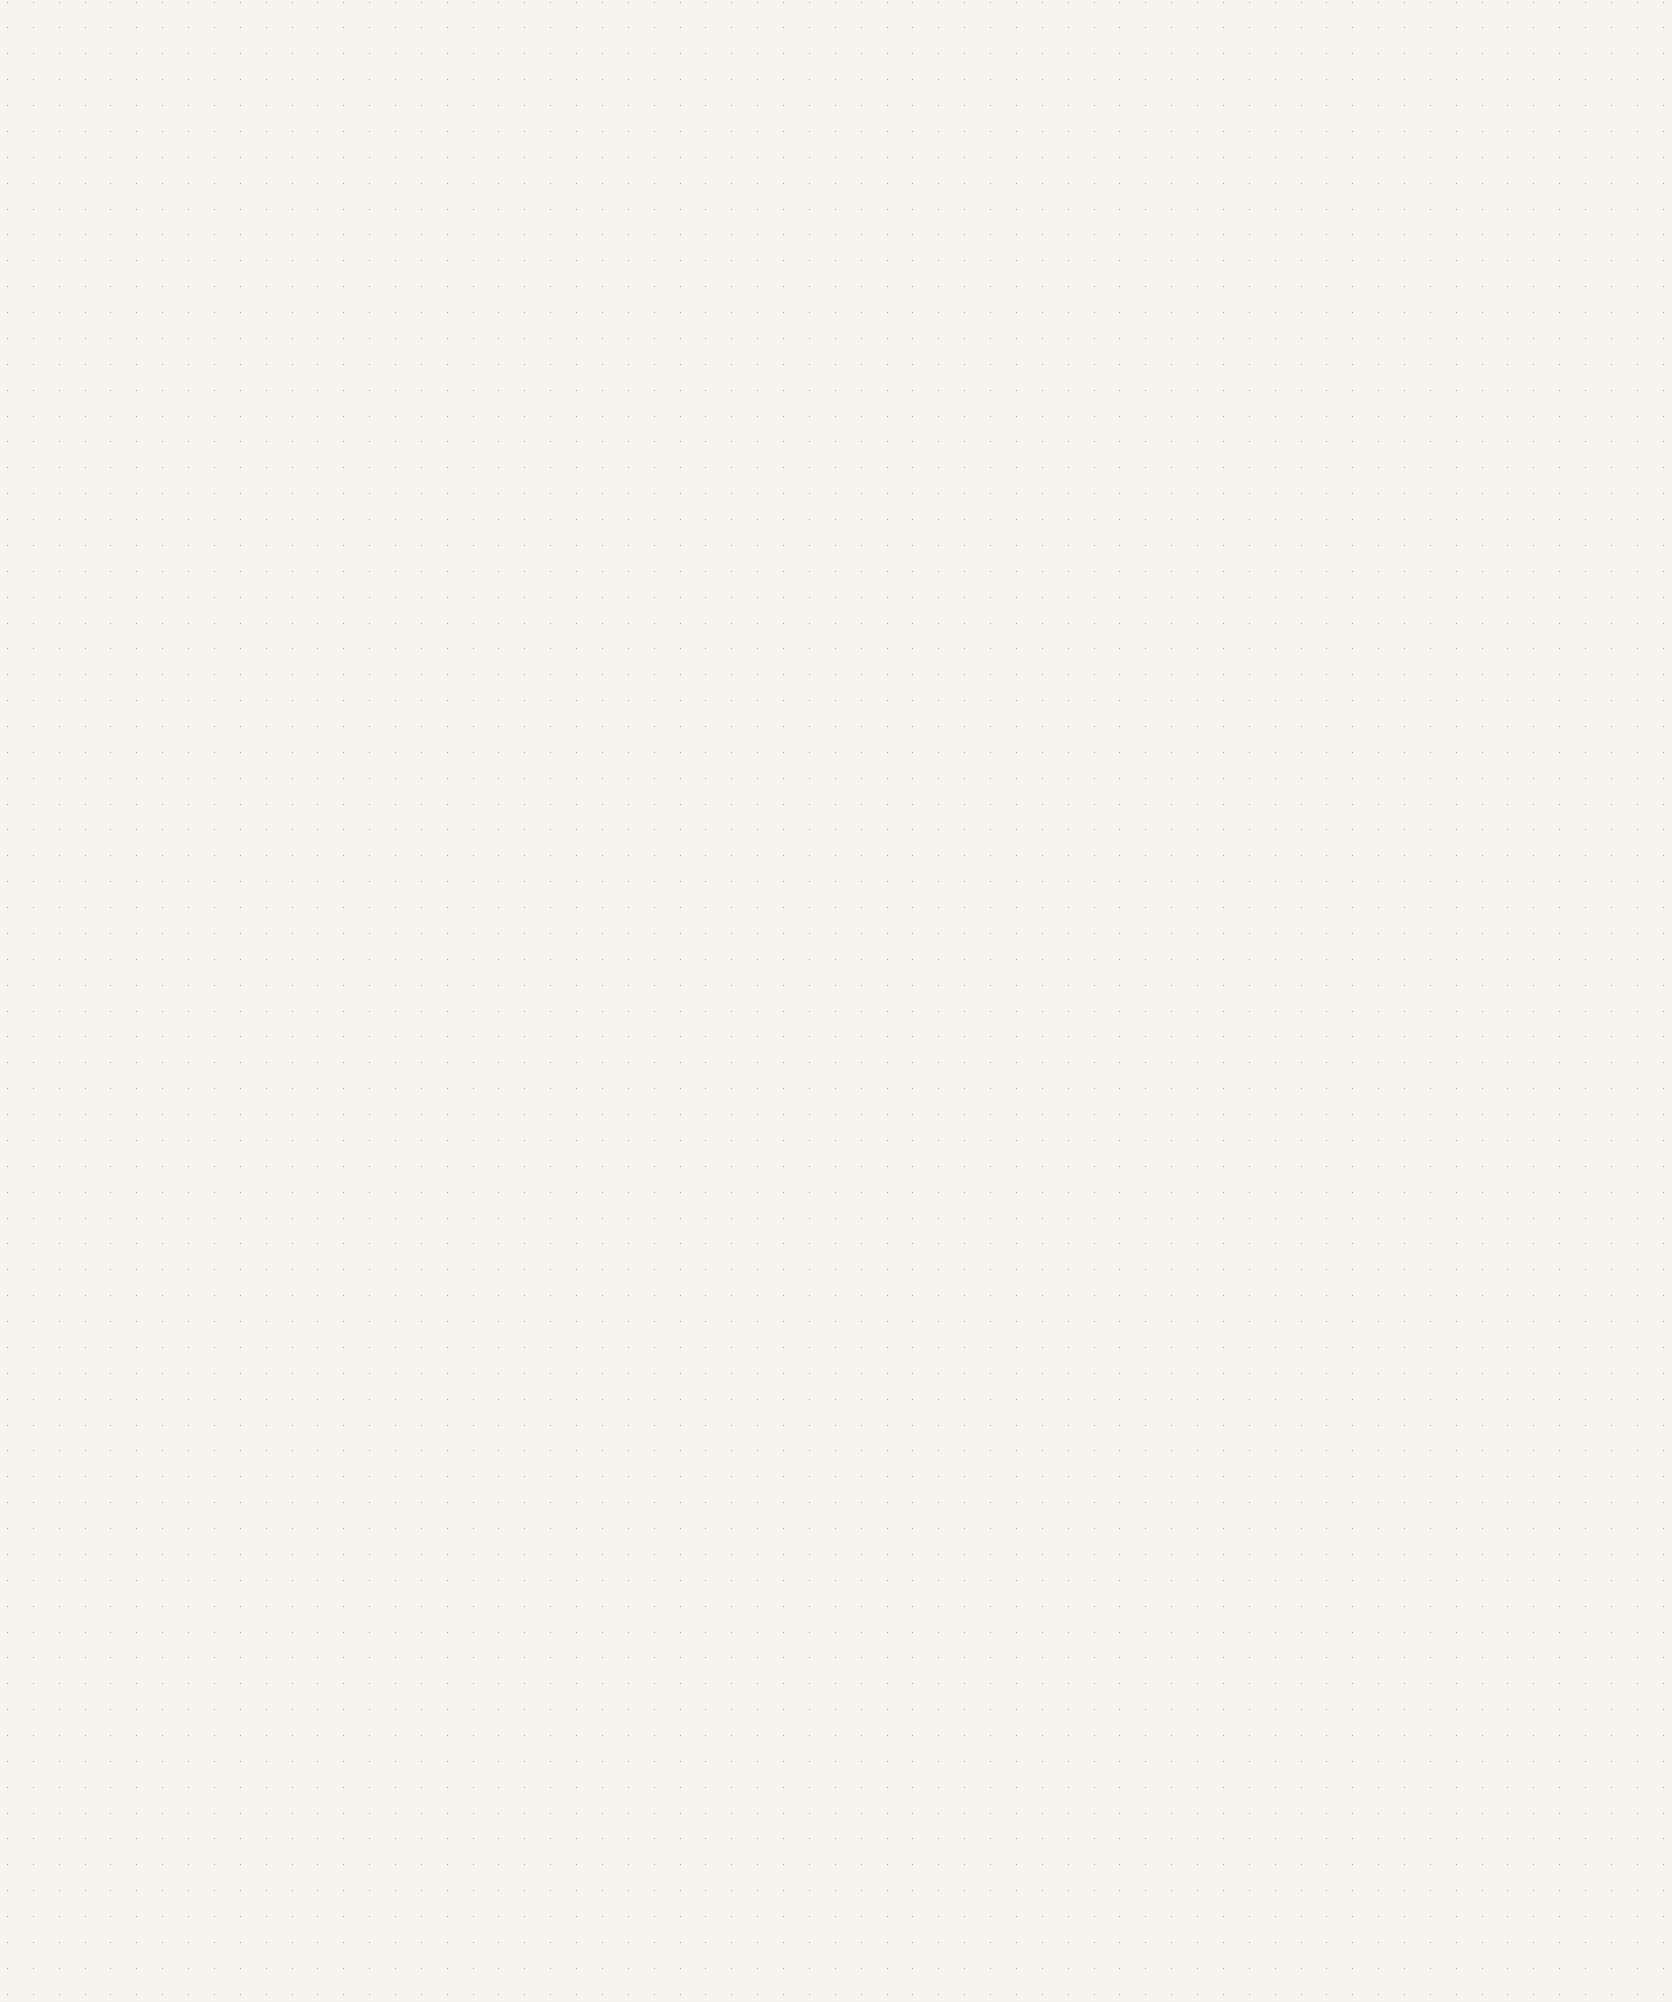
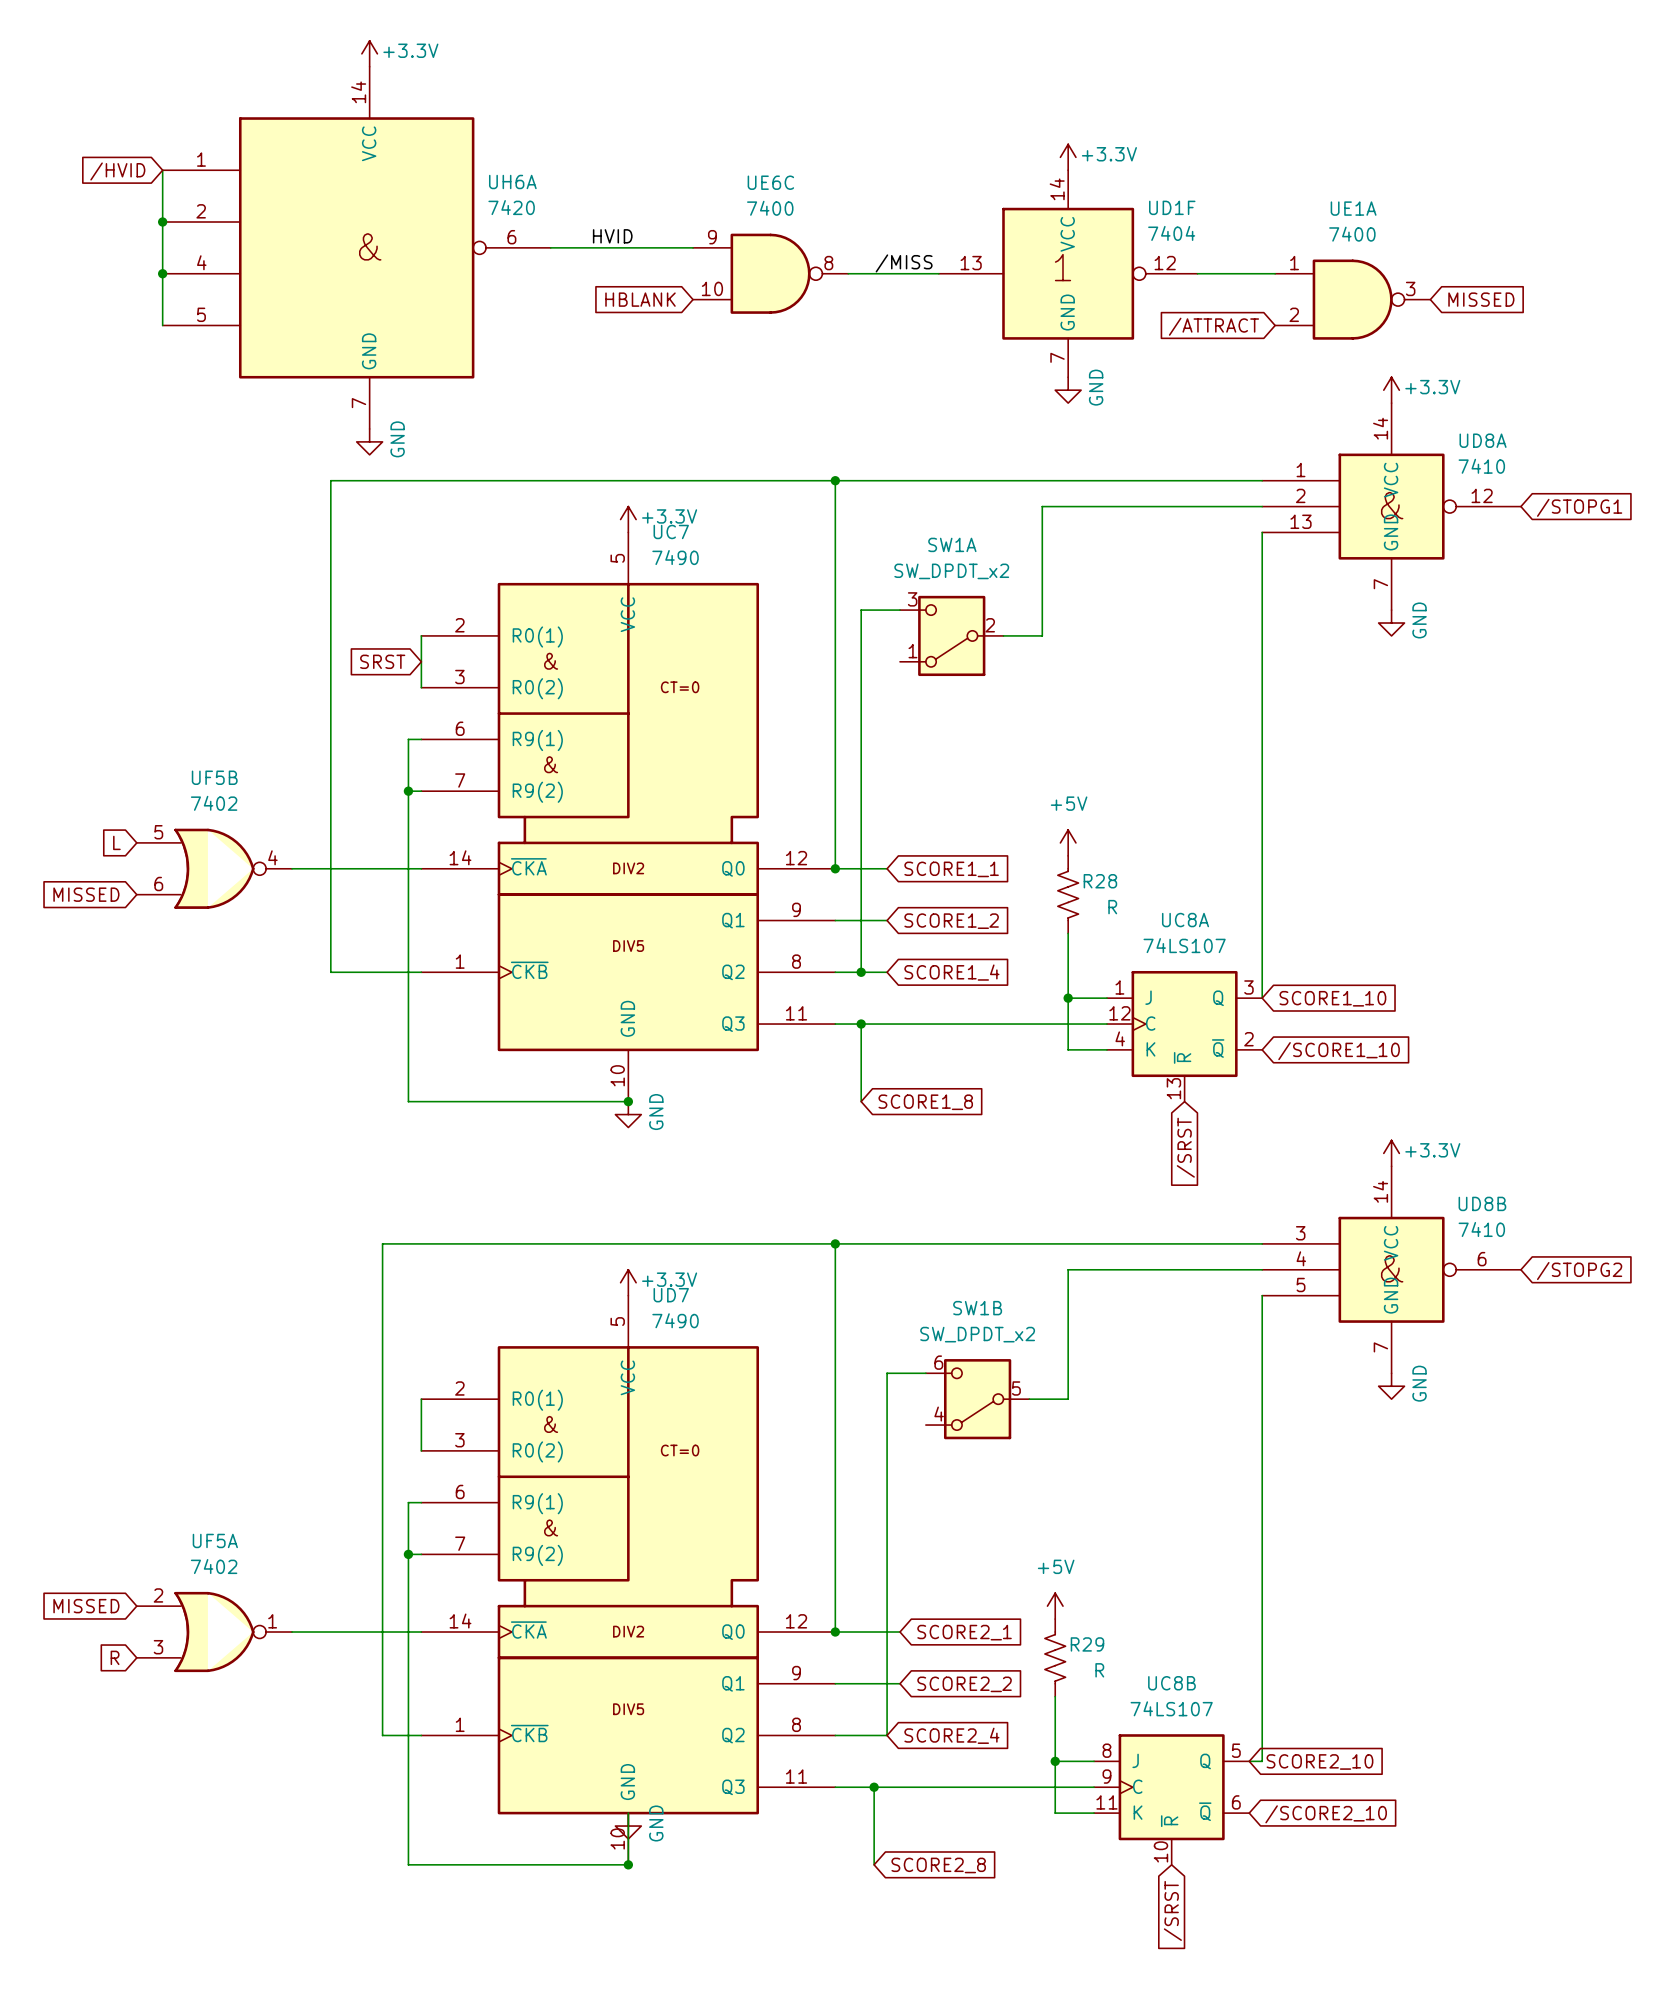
power symbol: none -> +3.3V (369, 53)
power symbol: none -> +3.3V (1068, 157)
global label: none -> /HVID (117, 171)
wire: none -> (162, 170) (162, 325)
junction: none -> (162, 222)
label: none -> HVID (612, 236)
UH6A: none -> 7420 (356, 247)
wire: none -> (550, 247) (693, 247)
label: none -> /MISS (904, 263)
junction: none -> (162, 273)
UE6C: none -> 7400 (770, 273)
wire: none -> (848, 273) (938, 273)
UD1F: none -> 7404 (1068, 273)
wire: none -> (1197, 273) (1275, 273)
global label: none -> HBLANK (640, 299)
UE1A: none -> 7400 (1352, 299)
global label: none -> MISSED (1481, 299)
global label: none -> /ATTRACT (1213, 326)
power symbol: none -> GND (1068, 390)
power symbol: none -> +3.3V (1391, 390)
power symbol: none -> GND (369, 441)
wire: none -> (835, 480) (835, 868) (887, 868)
junction: none -> (835, 480)
wire: none -> (1262, 480) (330, 480) (330, 972) (421, 972)
wire: none -> (1262, 506) (1042, 506) (1042, 635) (1003, 635)
UD8A: none -> 7410 (1391, 506)
global label: none -> /STOPG1 (1579, 507)
power symbol: none -> +3.3V (628, 519)
wire: none -> (1262, 532) (1262, 998)
wire: none -> (900, 610) (861, 610) (861, 972)
power symbol: none -> GND (1391, 623)
wire: none -> (421, 635) (421, 687)
SW1A: none -> SW_DPDT_x2 (951, 635)
global label: none -> SRST (382, 661)
wire: none -> (421, 739) (408, 739) (408, 1101) (628, 1101)
wire: none -> (408, 791) (421, 791)
junction: none -> (408, 791)
UC7: none -> 7490 (628, 817)
global label: none -> L (116, 842)
power symbol: none -> +5V (1068, 842)
UF5B: none -> 7402 (214, 868)
wire: none -> (292, 868) (421, 868)
junction: none -> (835, 868)
global label: none -> SCORE1_1 (951, 869)
global label: none -> MISSED (86, 894)
R28: none -> R (1068, 894)
wire: none -> (835, 920) (887, 920)
global label: none -> SCORE1_2 (951, 921)
wire: none -> (1068, 933) (1068, 1049) (1106, 1049)
wire: none -> (835, 972) (887, 972)
junction: none -> (861, 972)
global label: none -> SCORE1_4 (951, 972)
wire: none -> (1068, 998) (1106, 998)
junction: none -> (1068, 998)
global label: none -> SCORE1_10 (1332, 998)
wire: none -> (835, 1024) (1106, 1024)
wire: none -> (861, 1024) (861, 1101)
junction: none -> (861, 1024)
UC8A: none -> 74LS107 (1184, 1036)
global label: none -> /SCORE1_10 (1339, 1051)
junction: none -> (628, 1101)
global label: none -> SCORE1_8 (925, 1102)
power symbol: none -> GND (628, 1114)
global label: none -> /SRST (1185, 1147)
power symbol: none -> +3.3V (1391, 1153)
wire: none -> (835, 1243) (835, 1632) (900, 1632)
junction: none -> (835, 1243)
wire: none -> (1262, 1243) (382, 1243) (382, 1735) (421, 1735)
wire: none -> (1262, 1269) (1068, 1269) (1068, 1399) (1029, 1399)
UD8B: none -> 7410 (1391, 1269)
global label: none -> /STOPG2 (1579, 1271)
power symbol: none -> +3.3V (628, 1282)
wire: none -> (1262, 1295) (1262, 1761) (1249, 1761)
wire: none -> (925, 1373) (887, 1373) (887, 1735) (835, 1735)
power symbol: none -> GND (1391, 1386)
wire: none -> (421, 1399) (421, 1450)
SW1B: none -> SW_DPDT_x2 (977, 1399)
wire: none -> (421, 1502) (408, 1502) (408, 1864) (628, 1864) (628, 1813)
wire: none -> (408, 1554) (421, 1554)
junction: none -> (408, 1554)
UD7: none -> 7490 (628, 1580)
global label: none -> MISSED (86, 1606)
power symbol: none -> +5V (1055, 1606)
UF5A: none -> 7402 (214, 1632)
wire: none -> (292, 1632) (421, 1632)
junction: none -> (835, 1632)
global label: none -> SCORE2_1 (964, 1632)
global label: none -> R (115, 1657)
R29: none -> R (1055, 1657)
wire: none -> (835, 1683) (900, 1683)
global label: none -> SCORE2_2 (964, 1684)
wire: none -> (1055, 1696) (1055, 1813) (1094, 1813)
global label: none -> SCORE2_4 (951, 1735)
wire: none -> (1055, 1761) (1094, 1761)
junction: none -> (1055, 1761)
global label: none -> SCORE2_10 (1319, 1761)
wire: none -> (835, 1787) (1094, 1787)
wire: none -> (874, 1787) (874, 1864)
junction: none -> (874, 1787)
UC8B: none -> 74LS107 (1171, 1799)
global label: none -> /SCORE2_10 (1326, 1814)
power symbol: none -> GND (628, 1826)
junction: none -> (628, 1864)
global label: none -> SCORE2_8 (938, 1865)
global label: none -> /SRST (1172, 1910)

